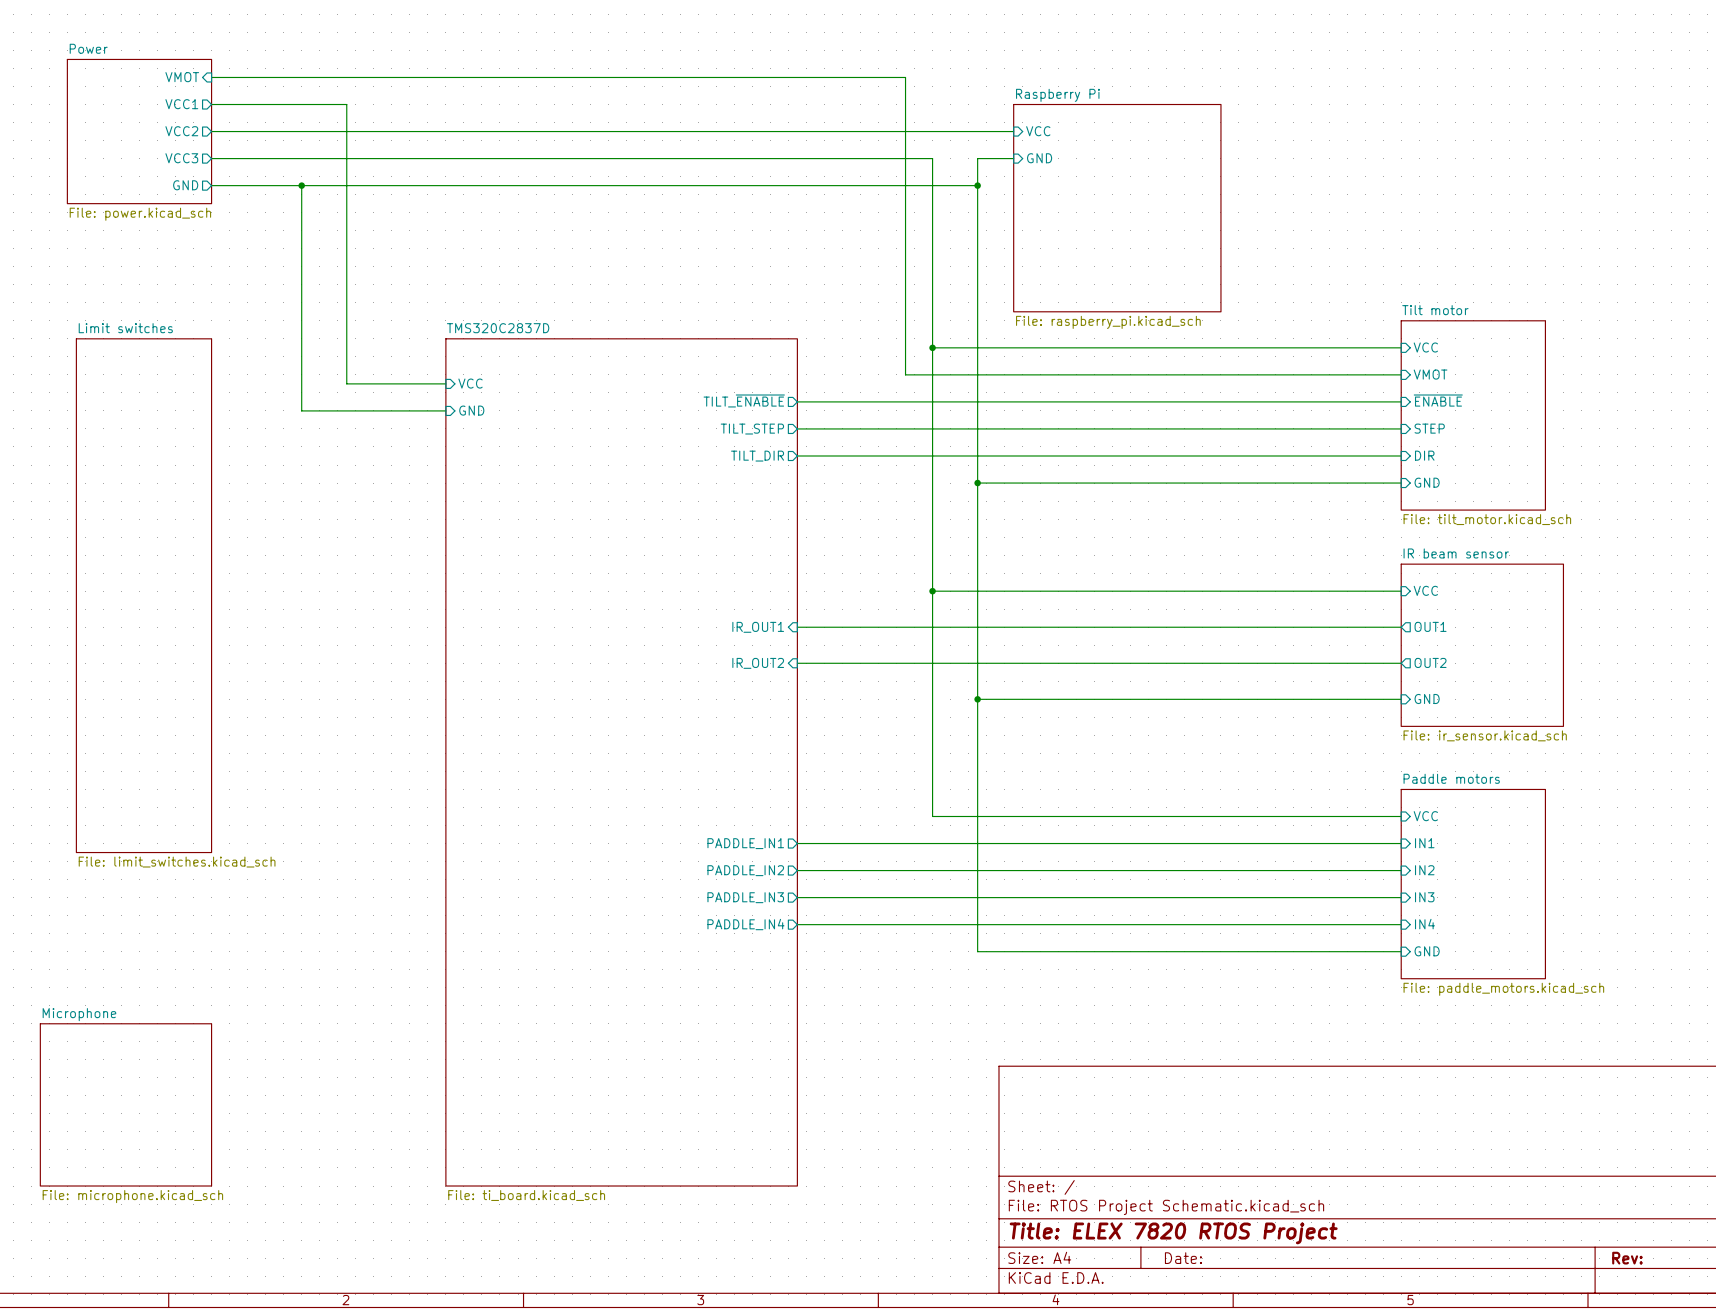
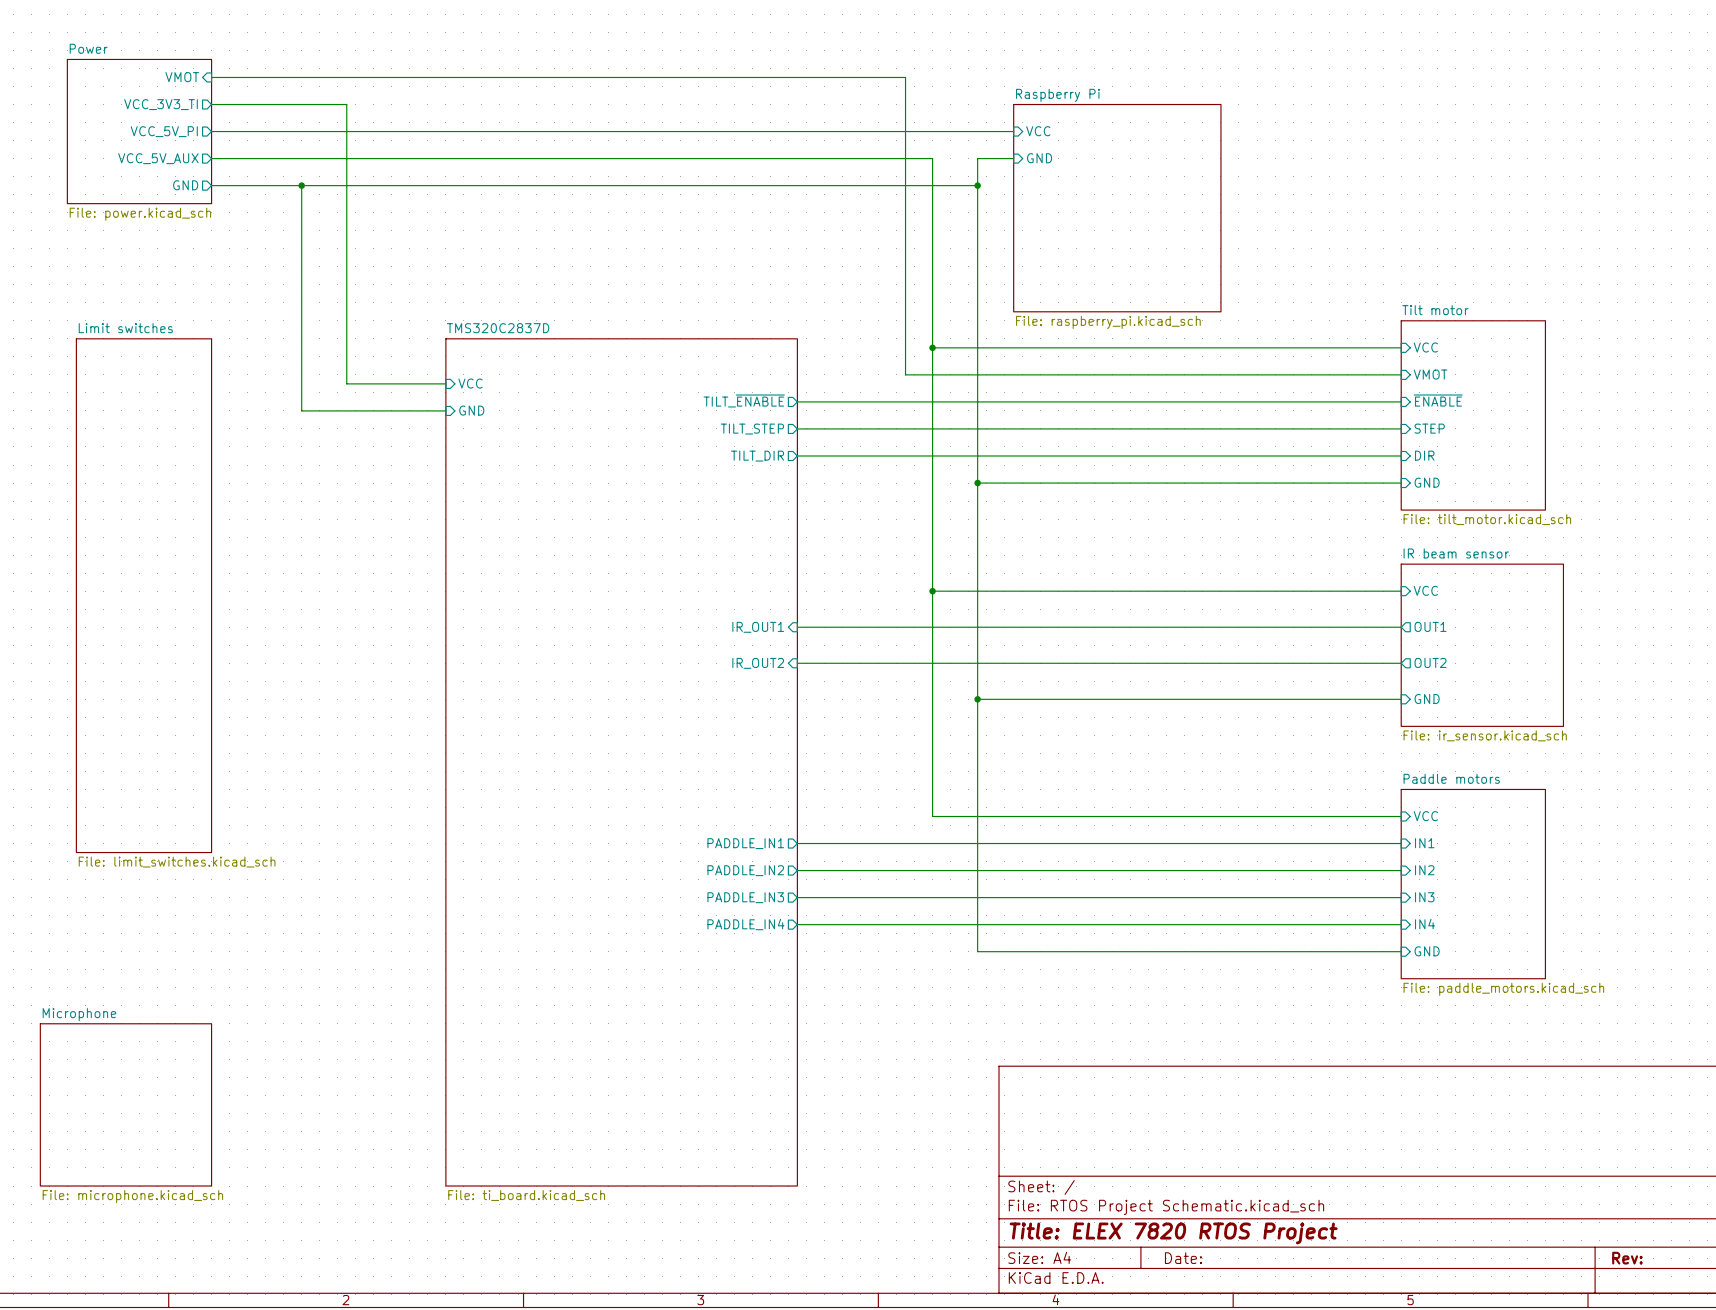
sheet pin: VCC1 (181, 104) -> VCC_3V3_TI (161, 104)
sheet pin: VCC2 (181, 131) -> VCC_5V_PI (164, 131)
sheet pin: VCC3 (181, 158) -> VCC_5V_AUX (158, 158)

